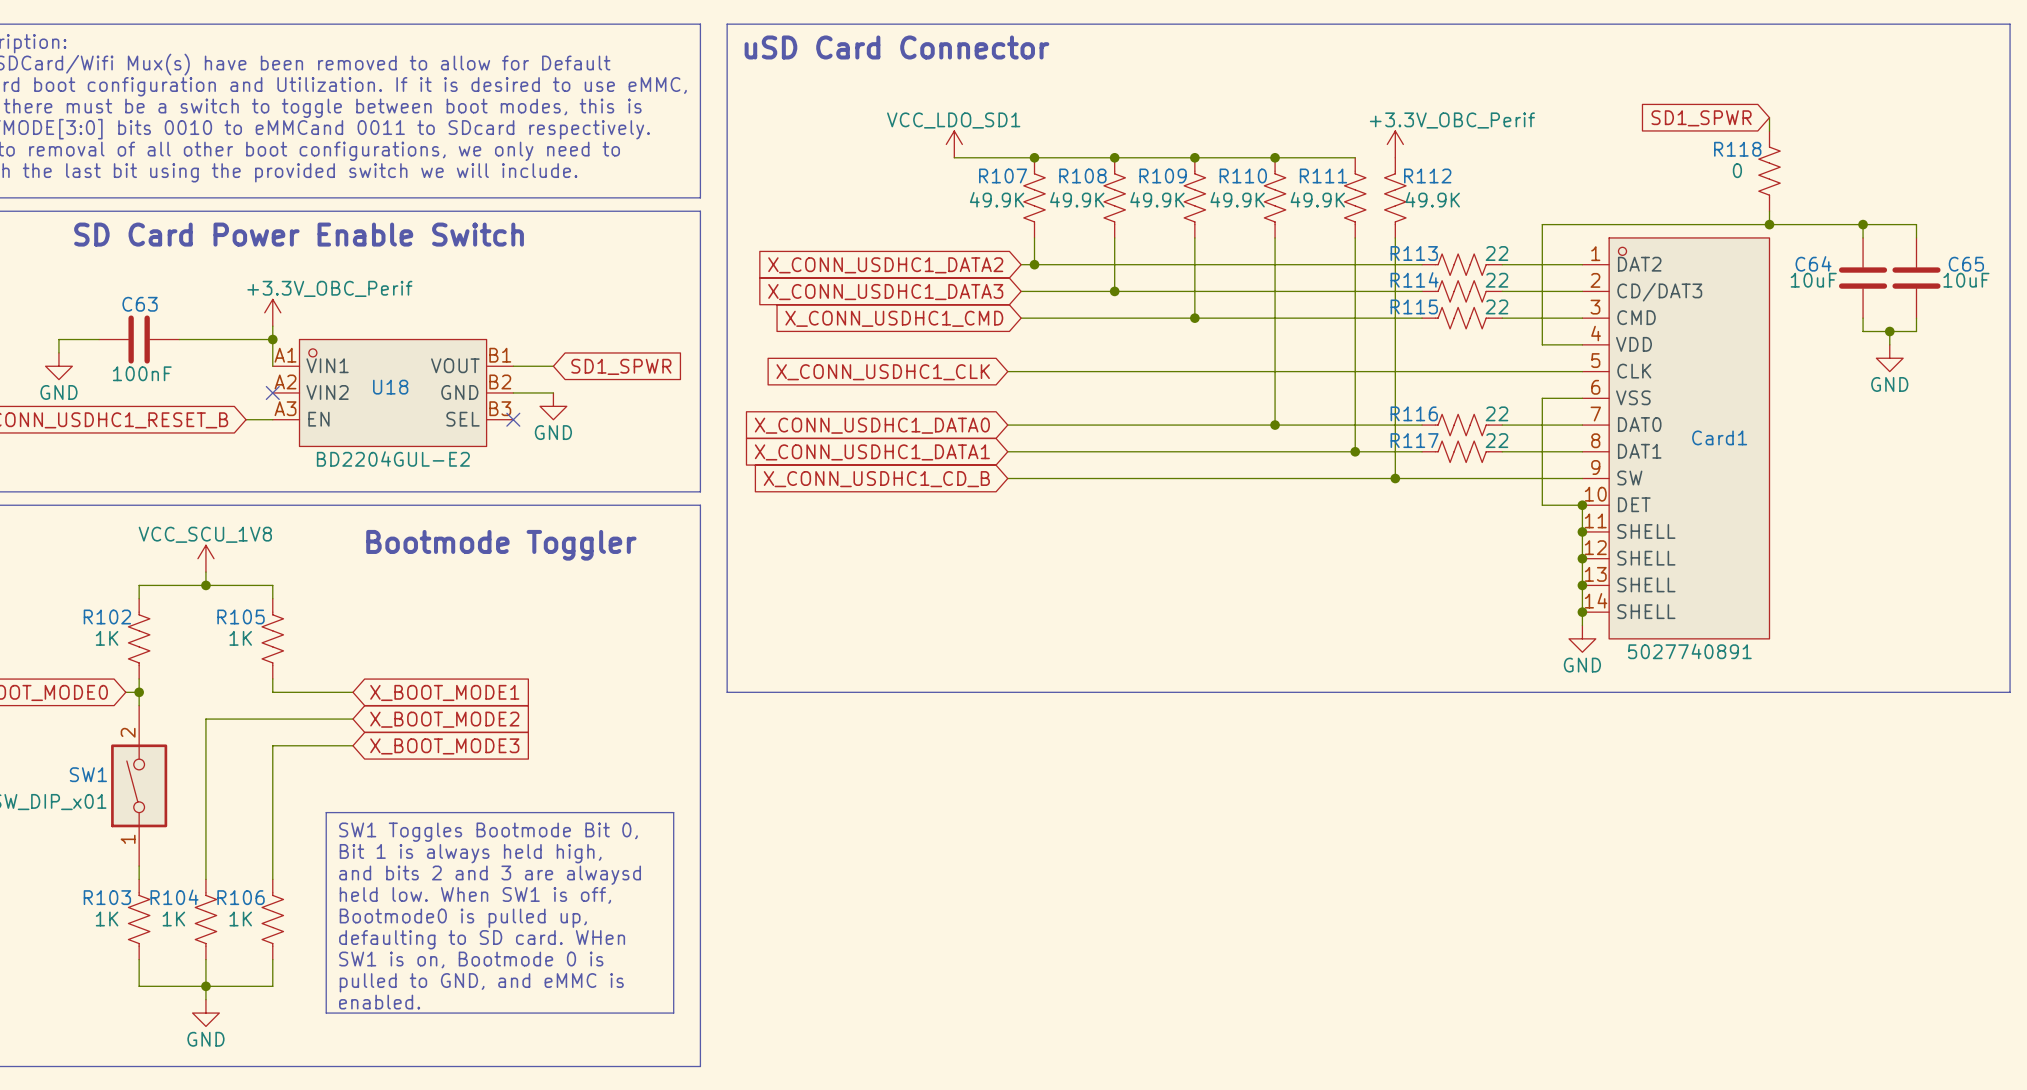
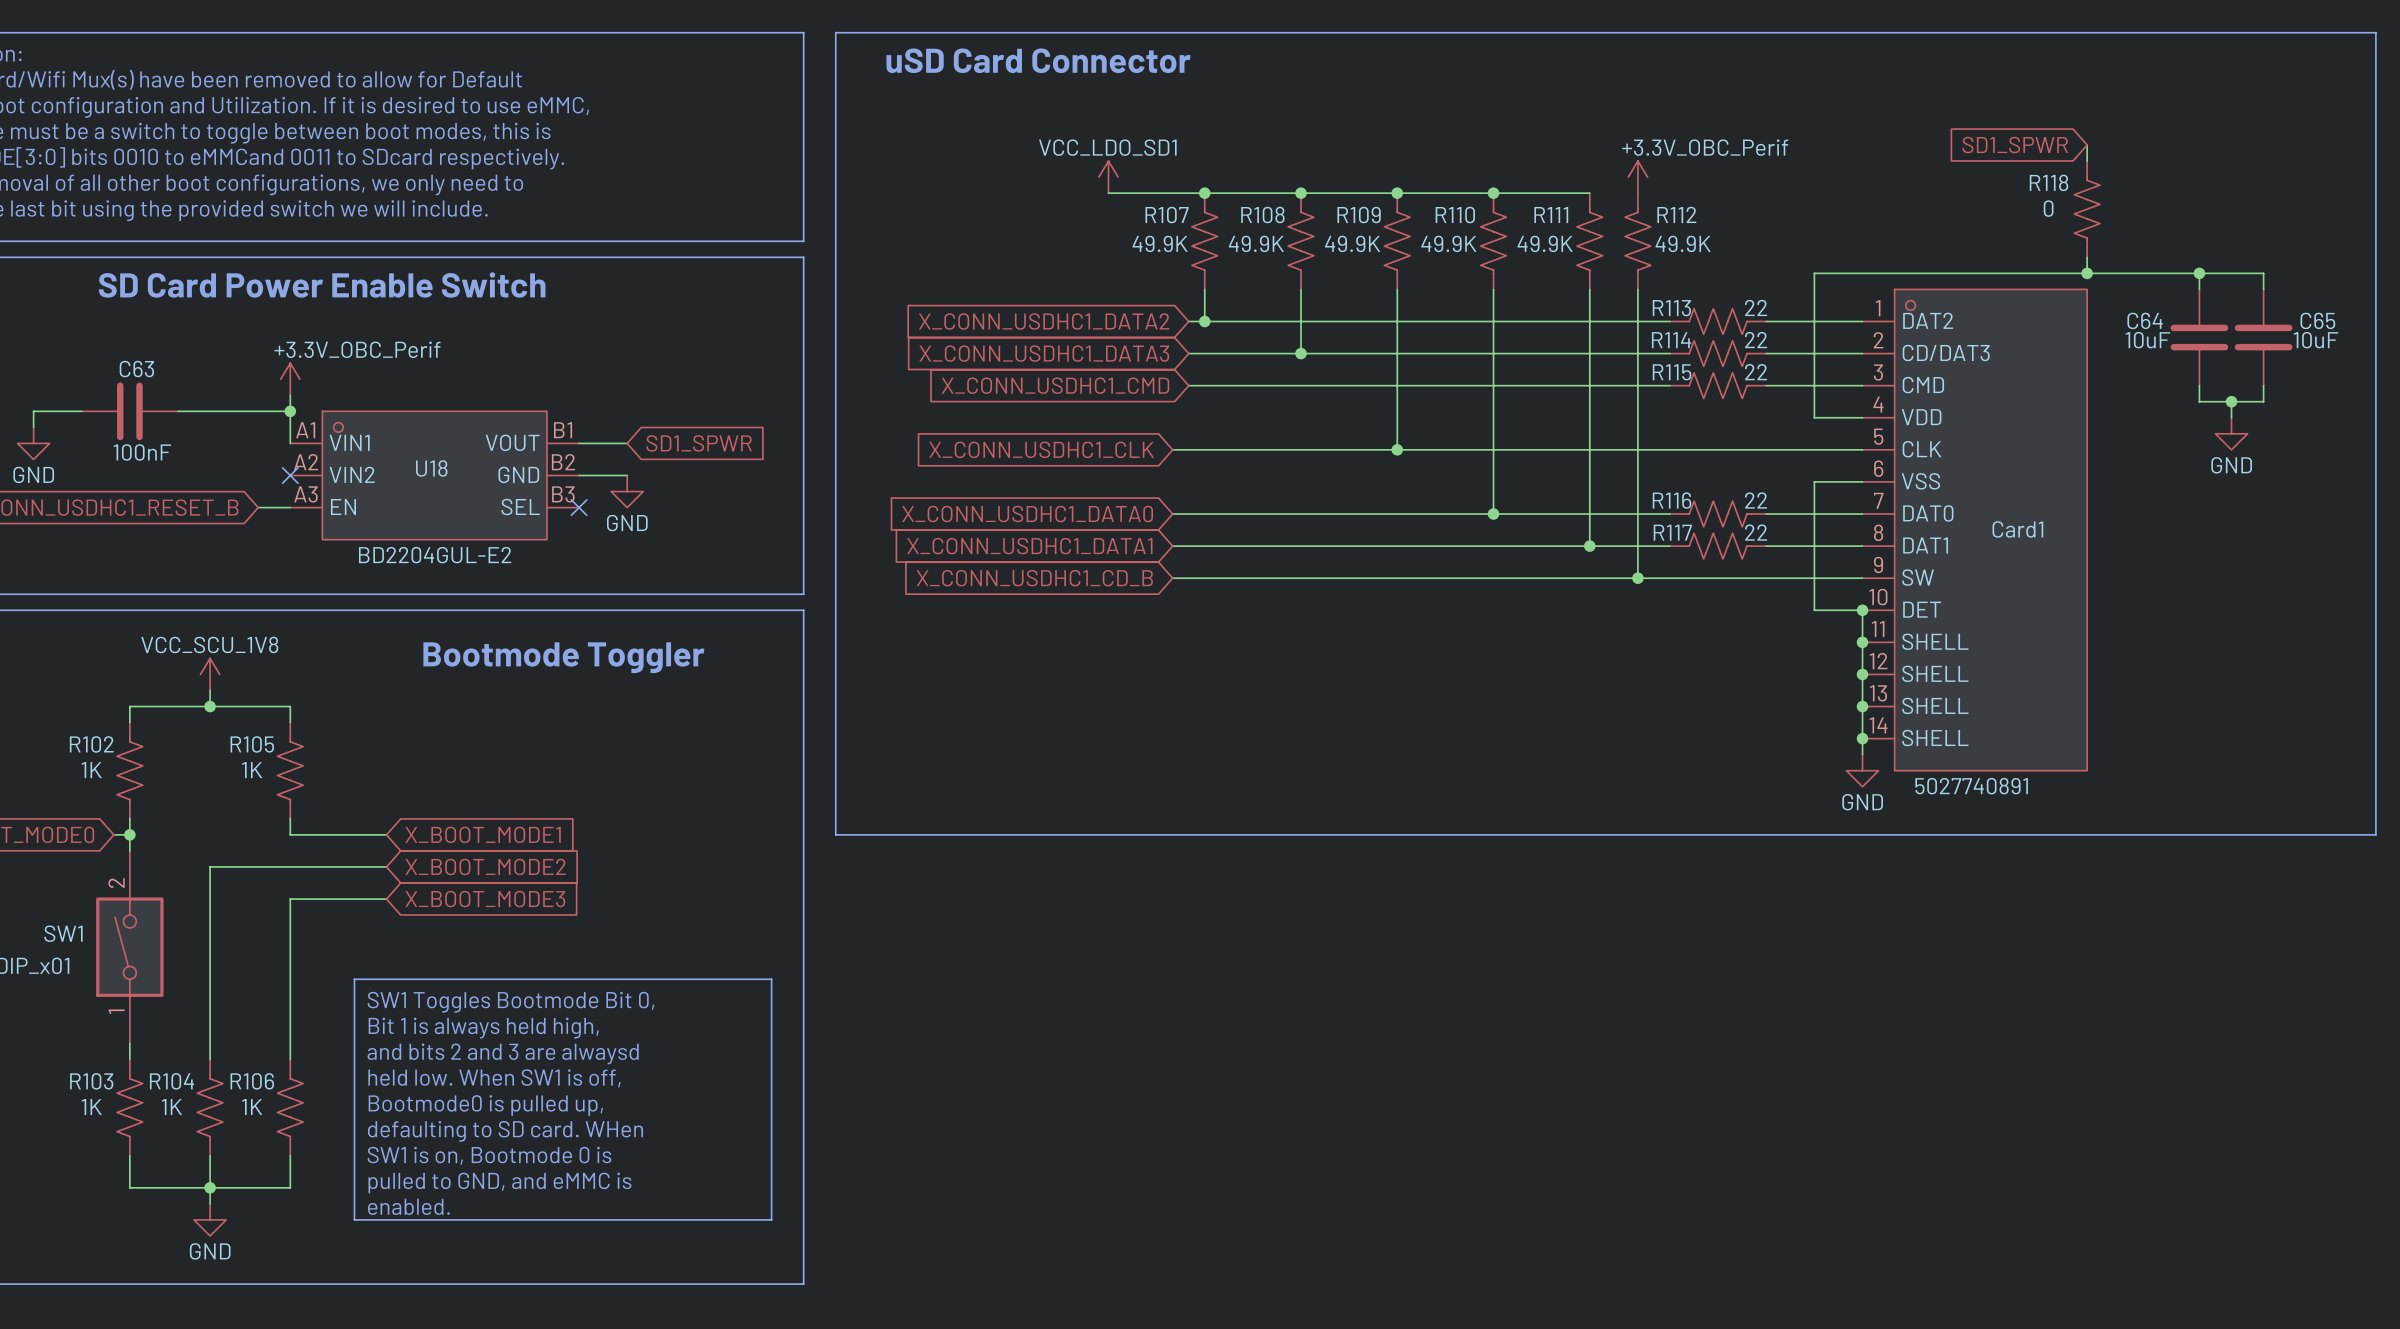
wire: none -> (1397, 385) (1397, 449)
junction position: (1194, 318) -> (1397, 449)

